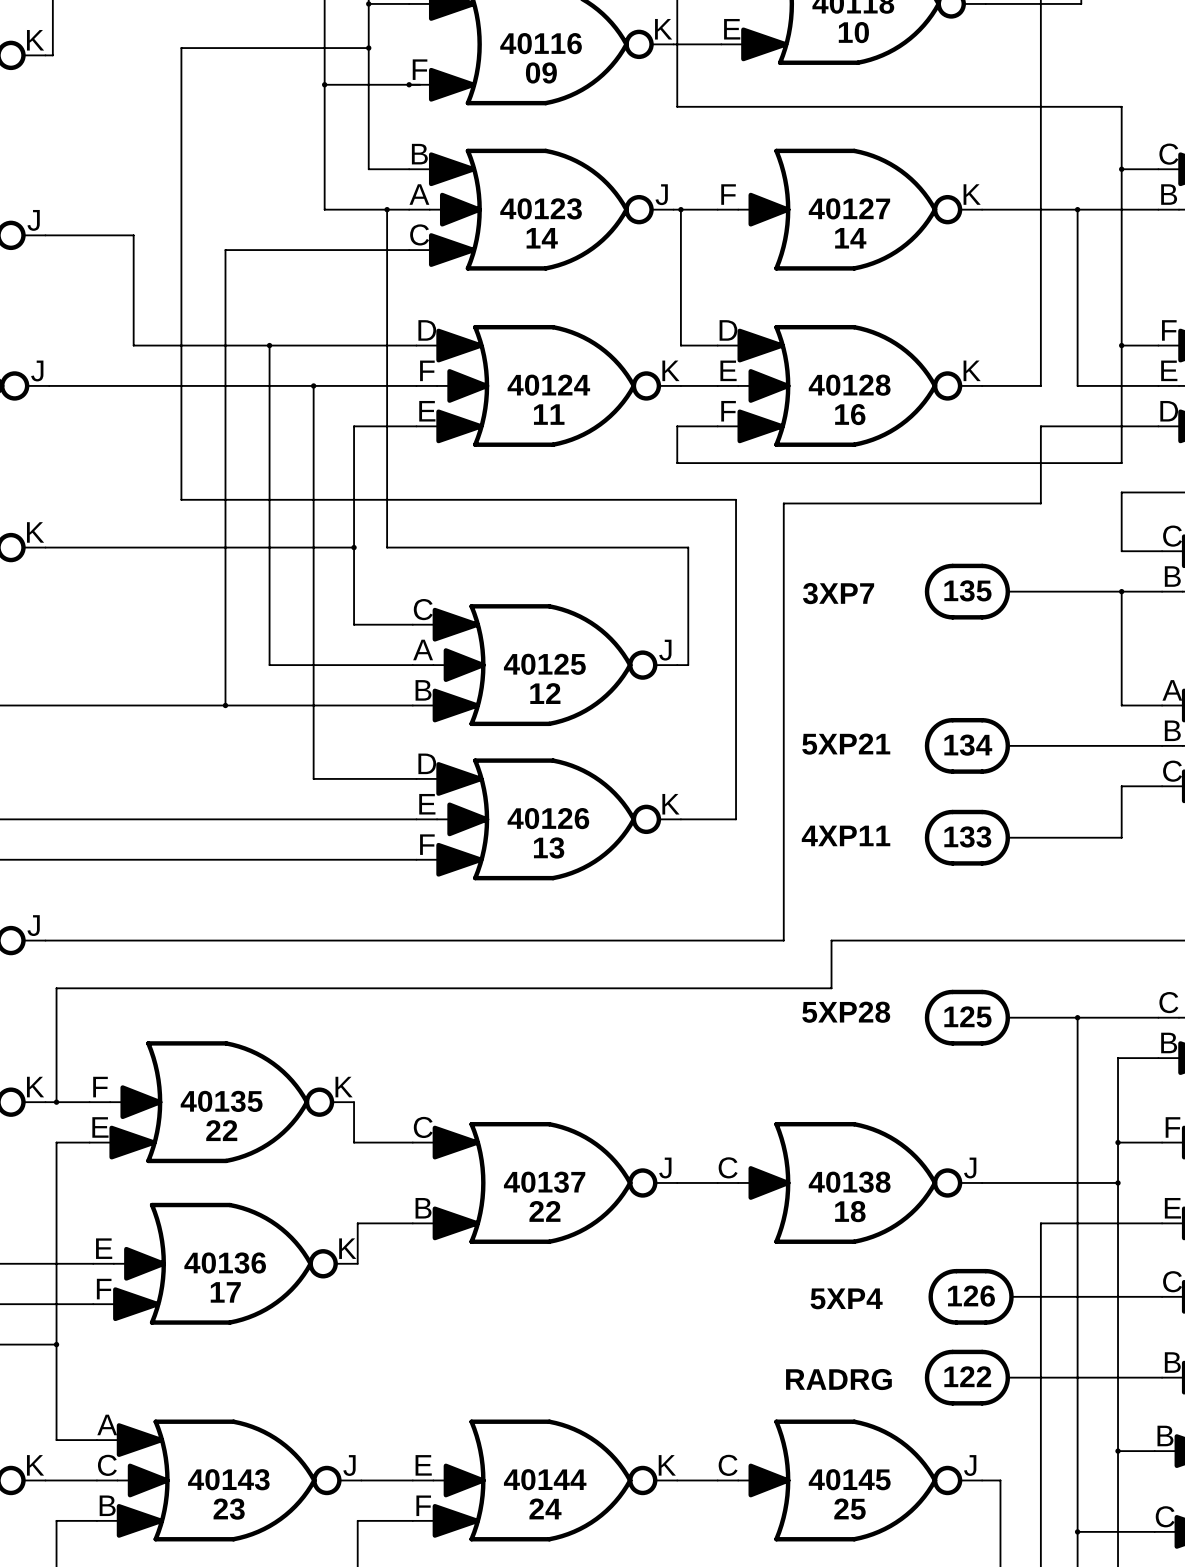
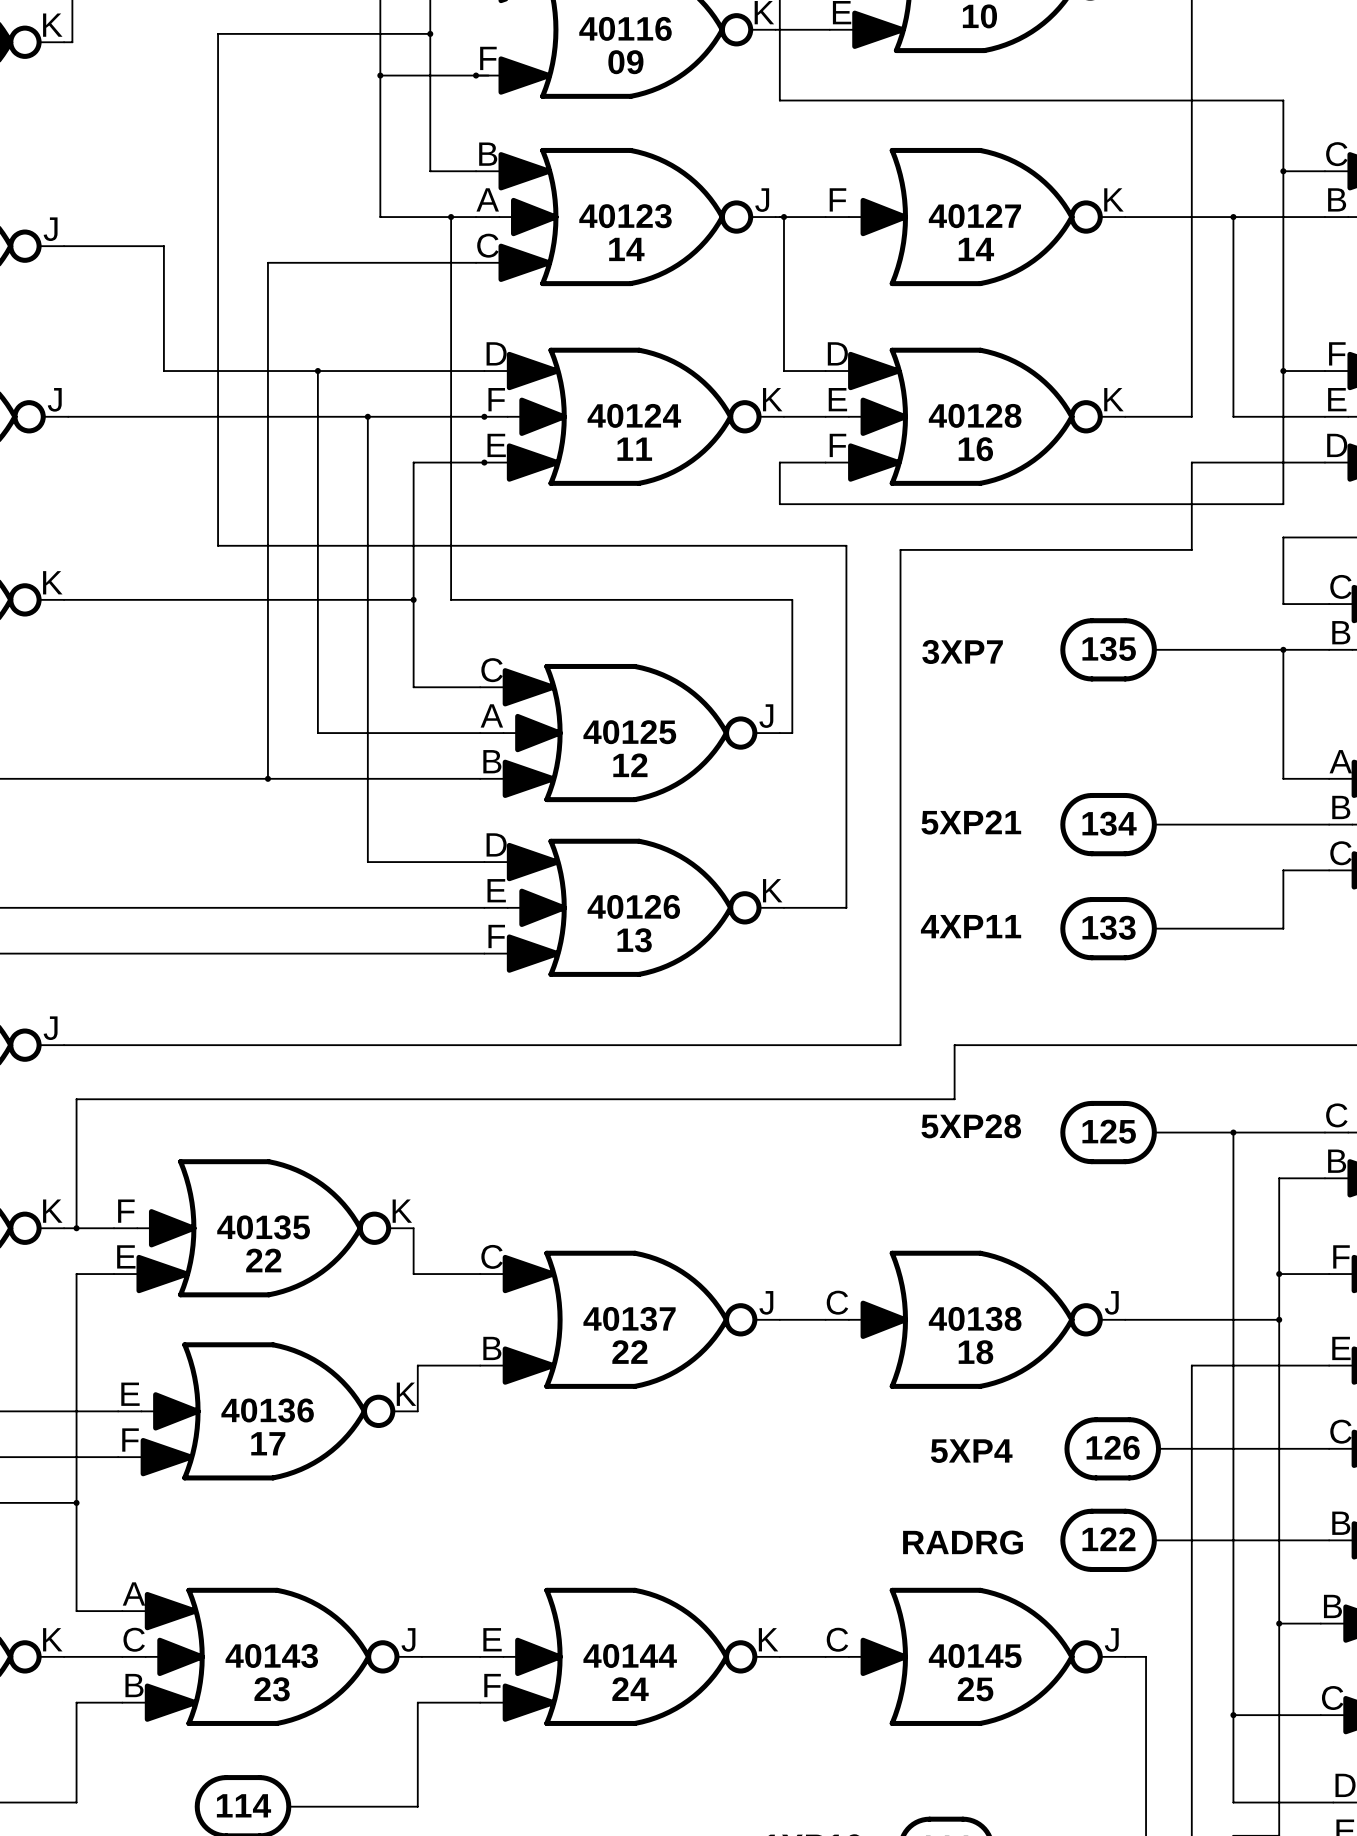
junction: none -> (484, 416)
junction: none -> (484, 462)

